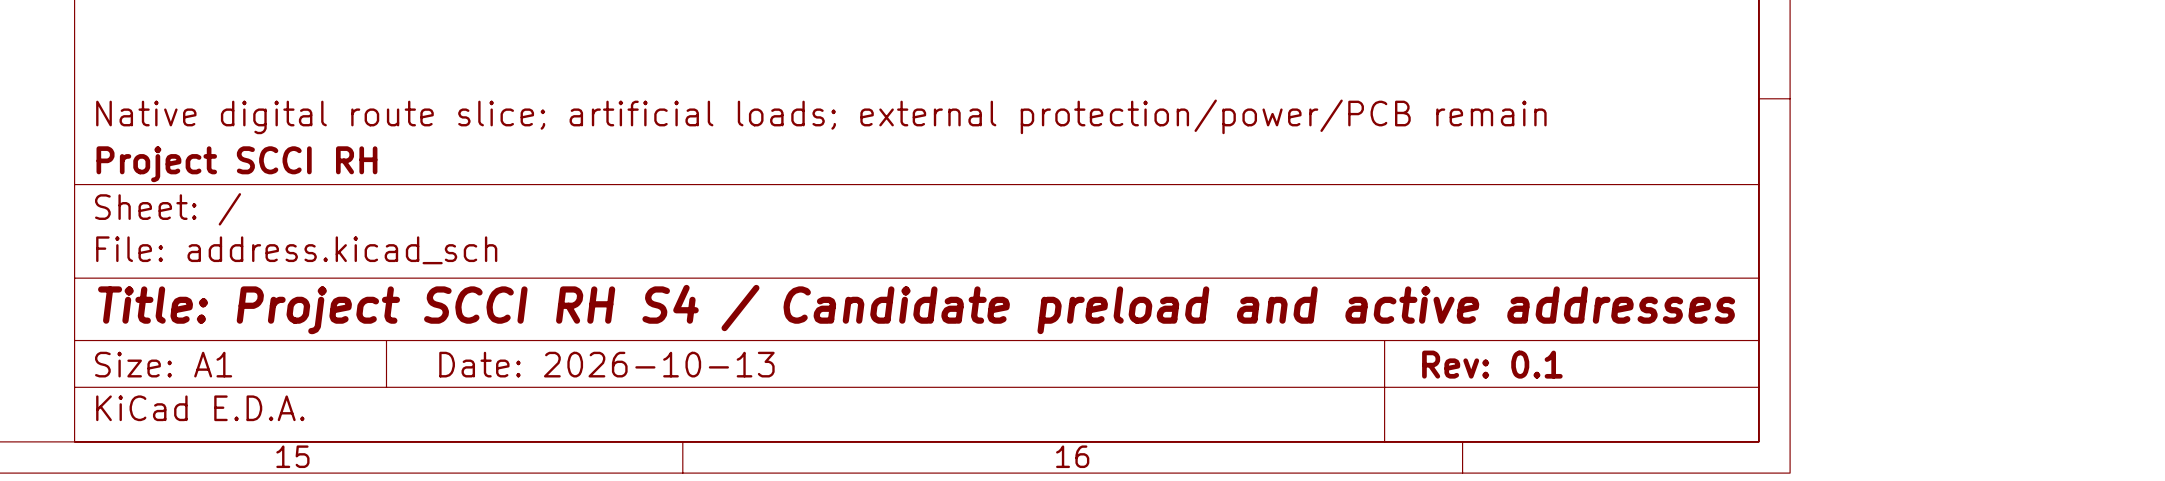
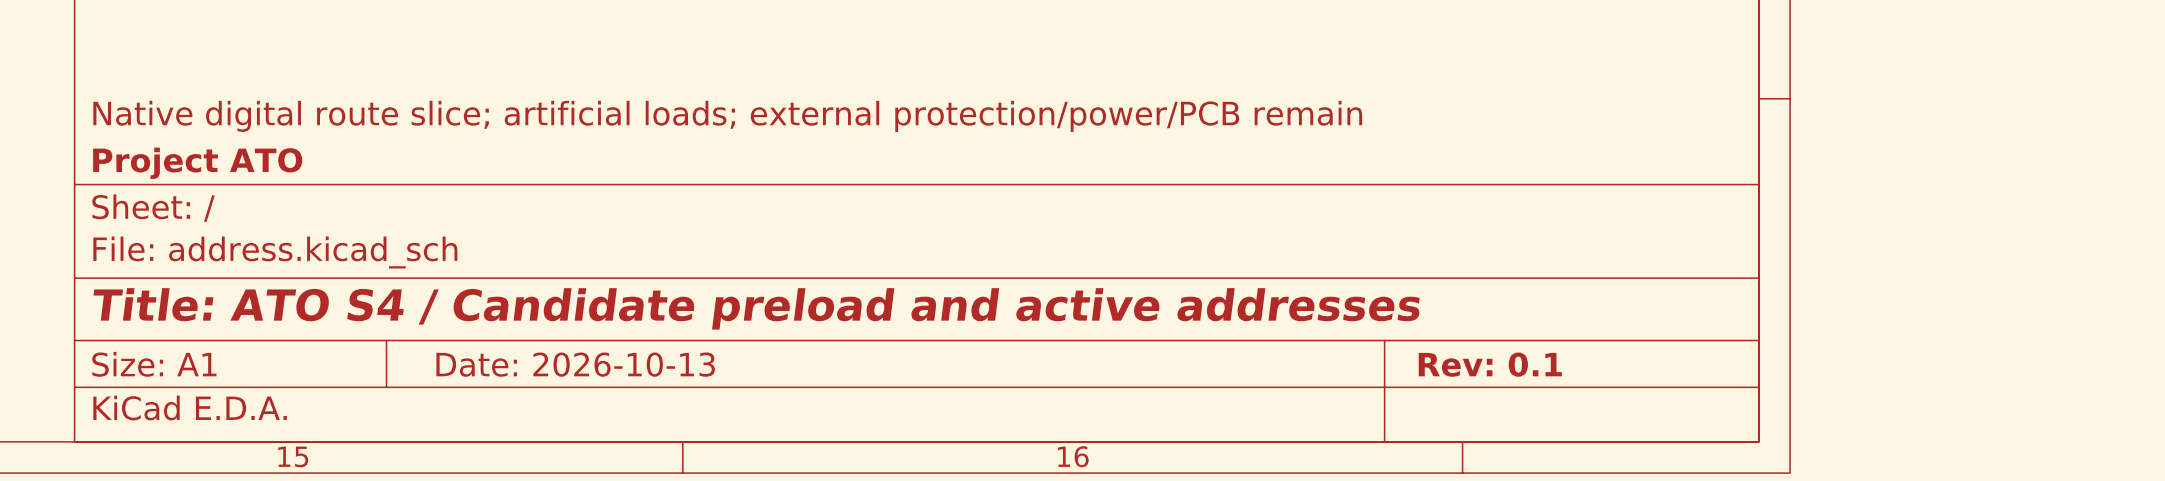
title block: Project SCCI RH (236, 164) -> Project ATO (197, 163)
title block: Title: Project SCCI RH S4 / Candidate preload and active addresses (916, 309) -> Title: ATO S4 / Candidate preload and active addresses (756, 308)

